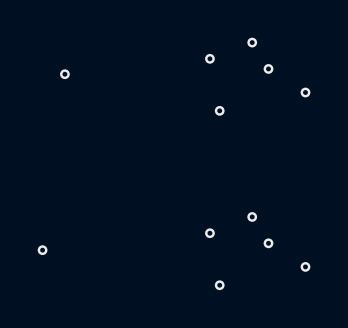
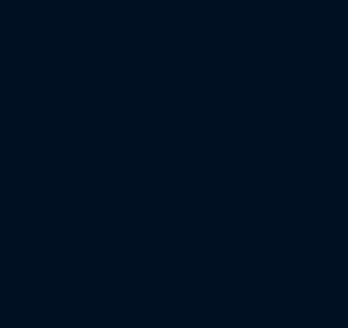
via: (252, 42) -> none
via: (209, 58) -> none
via: (268, 68) -> none
via: (64, 74) -> none
via: (305, 92) -> none
via: (219, 110) -> none
via: (252, 216) -> none
via: (209, 233) -> none
via: (268, 243) -> none
via: (42, 250) -> none
via: (305, 266) -> none
via: (219, 285) -> none

